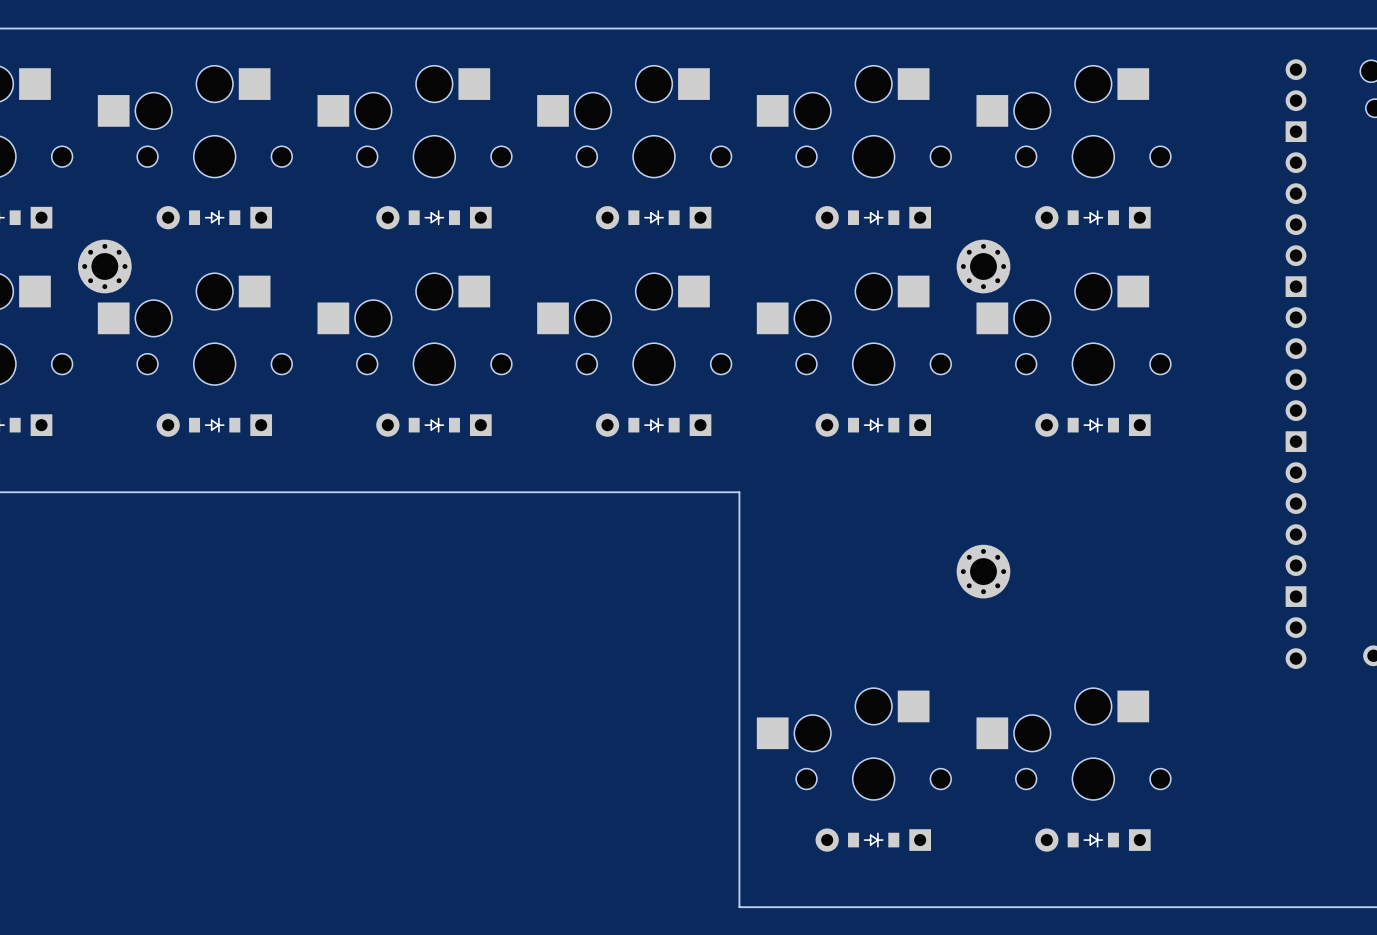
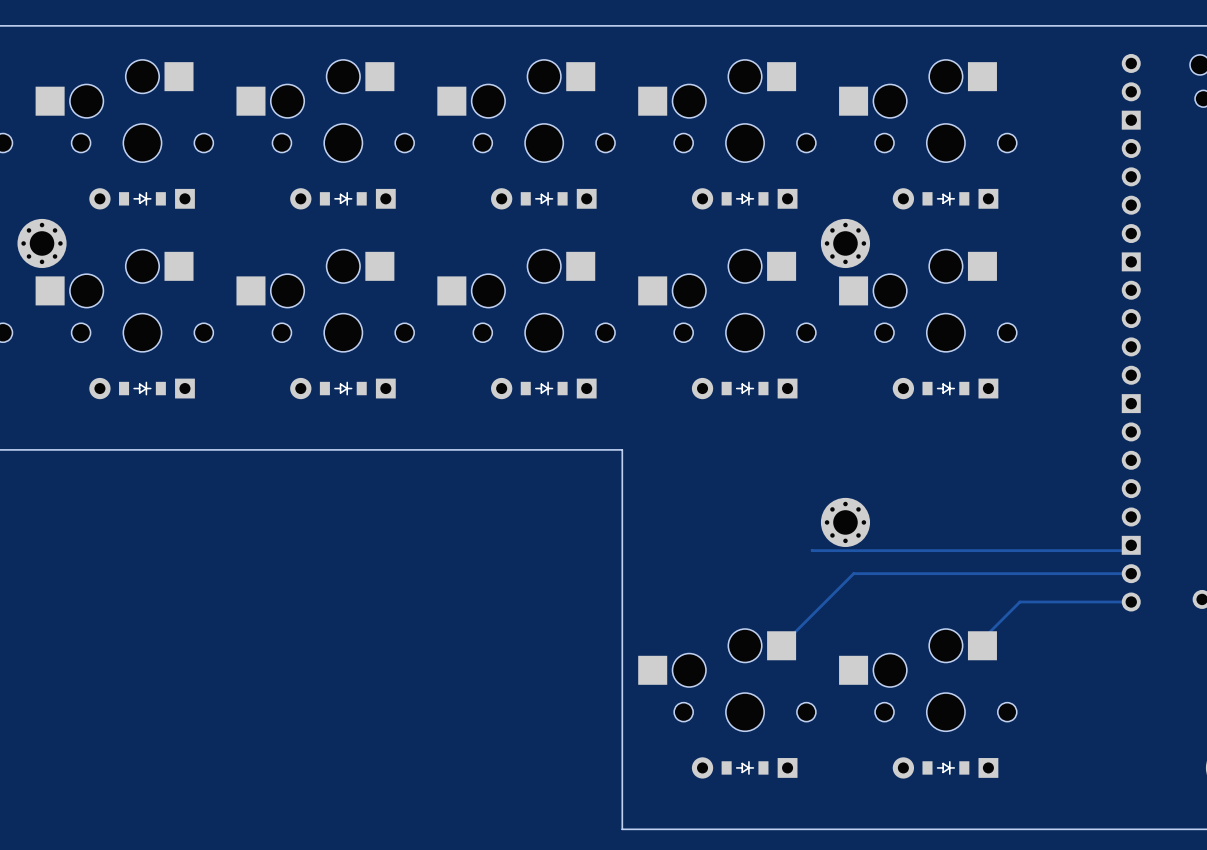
track: none -> (1131, 545) (1125, 550) (812, 550)
track: none -> (1131, 573) (853, 573) (781, 645)
track: none -> (1131, 602) (1019, 602) (982, 639) (982, 645)

